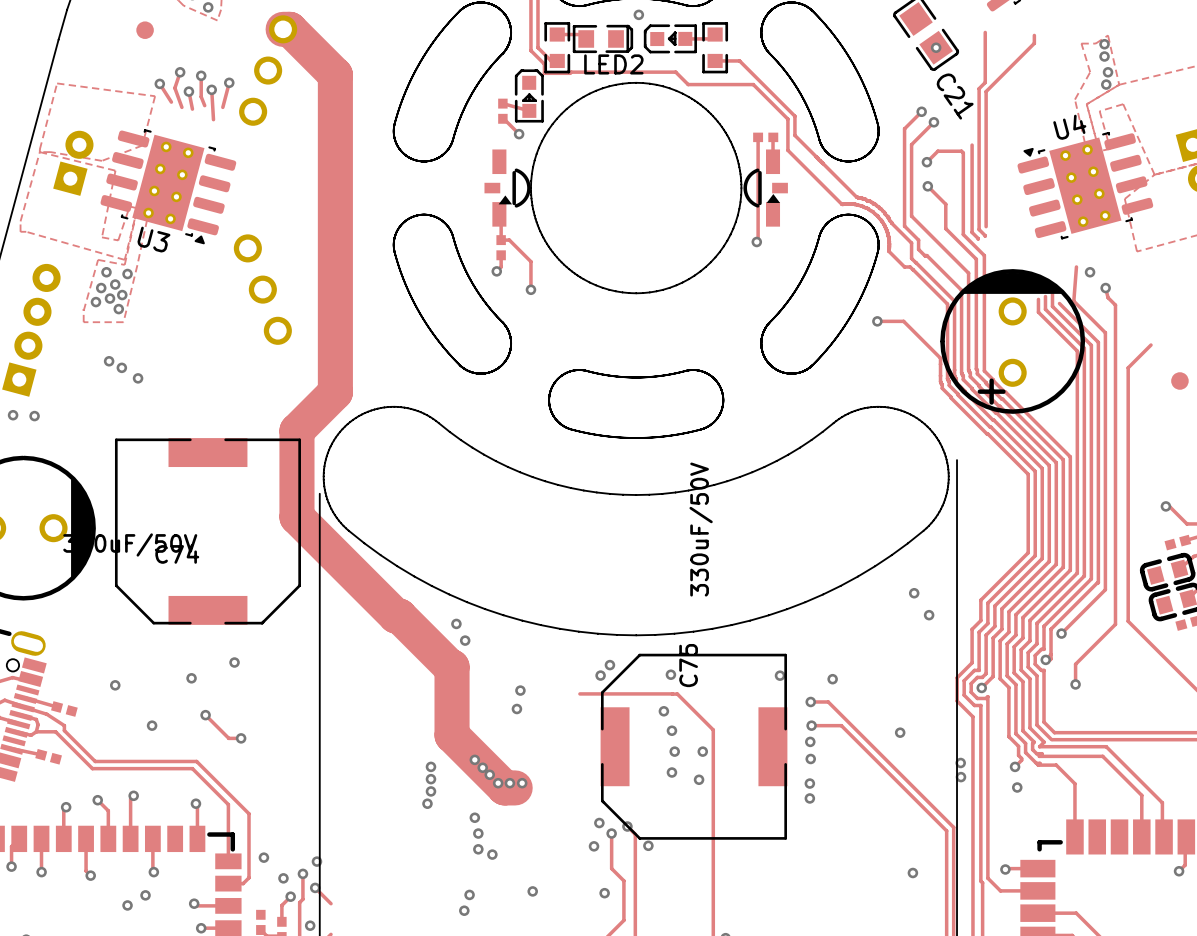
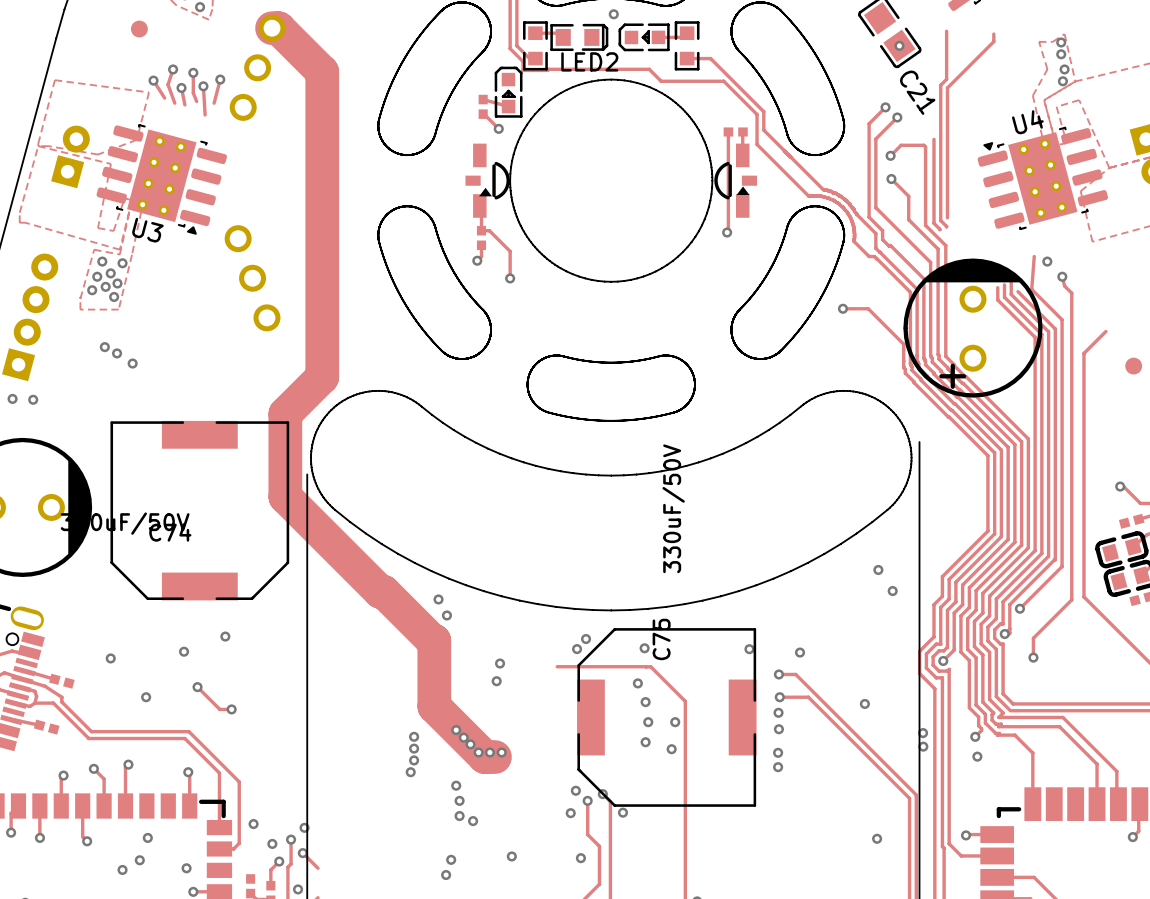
track: (152, 838) (152, 871) -> none
track: (196, 905) (228, 905) -> none

